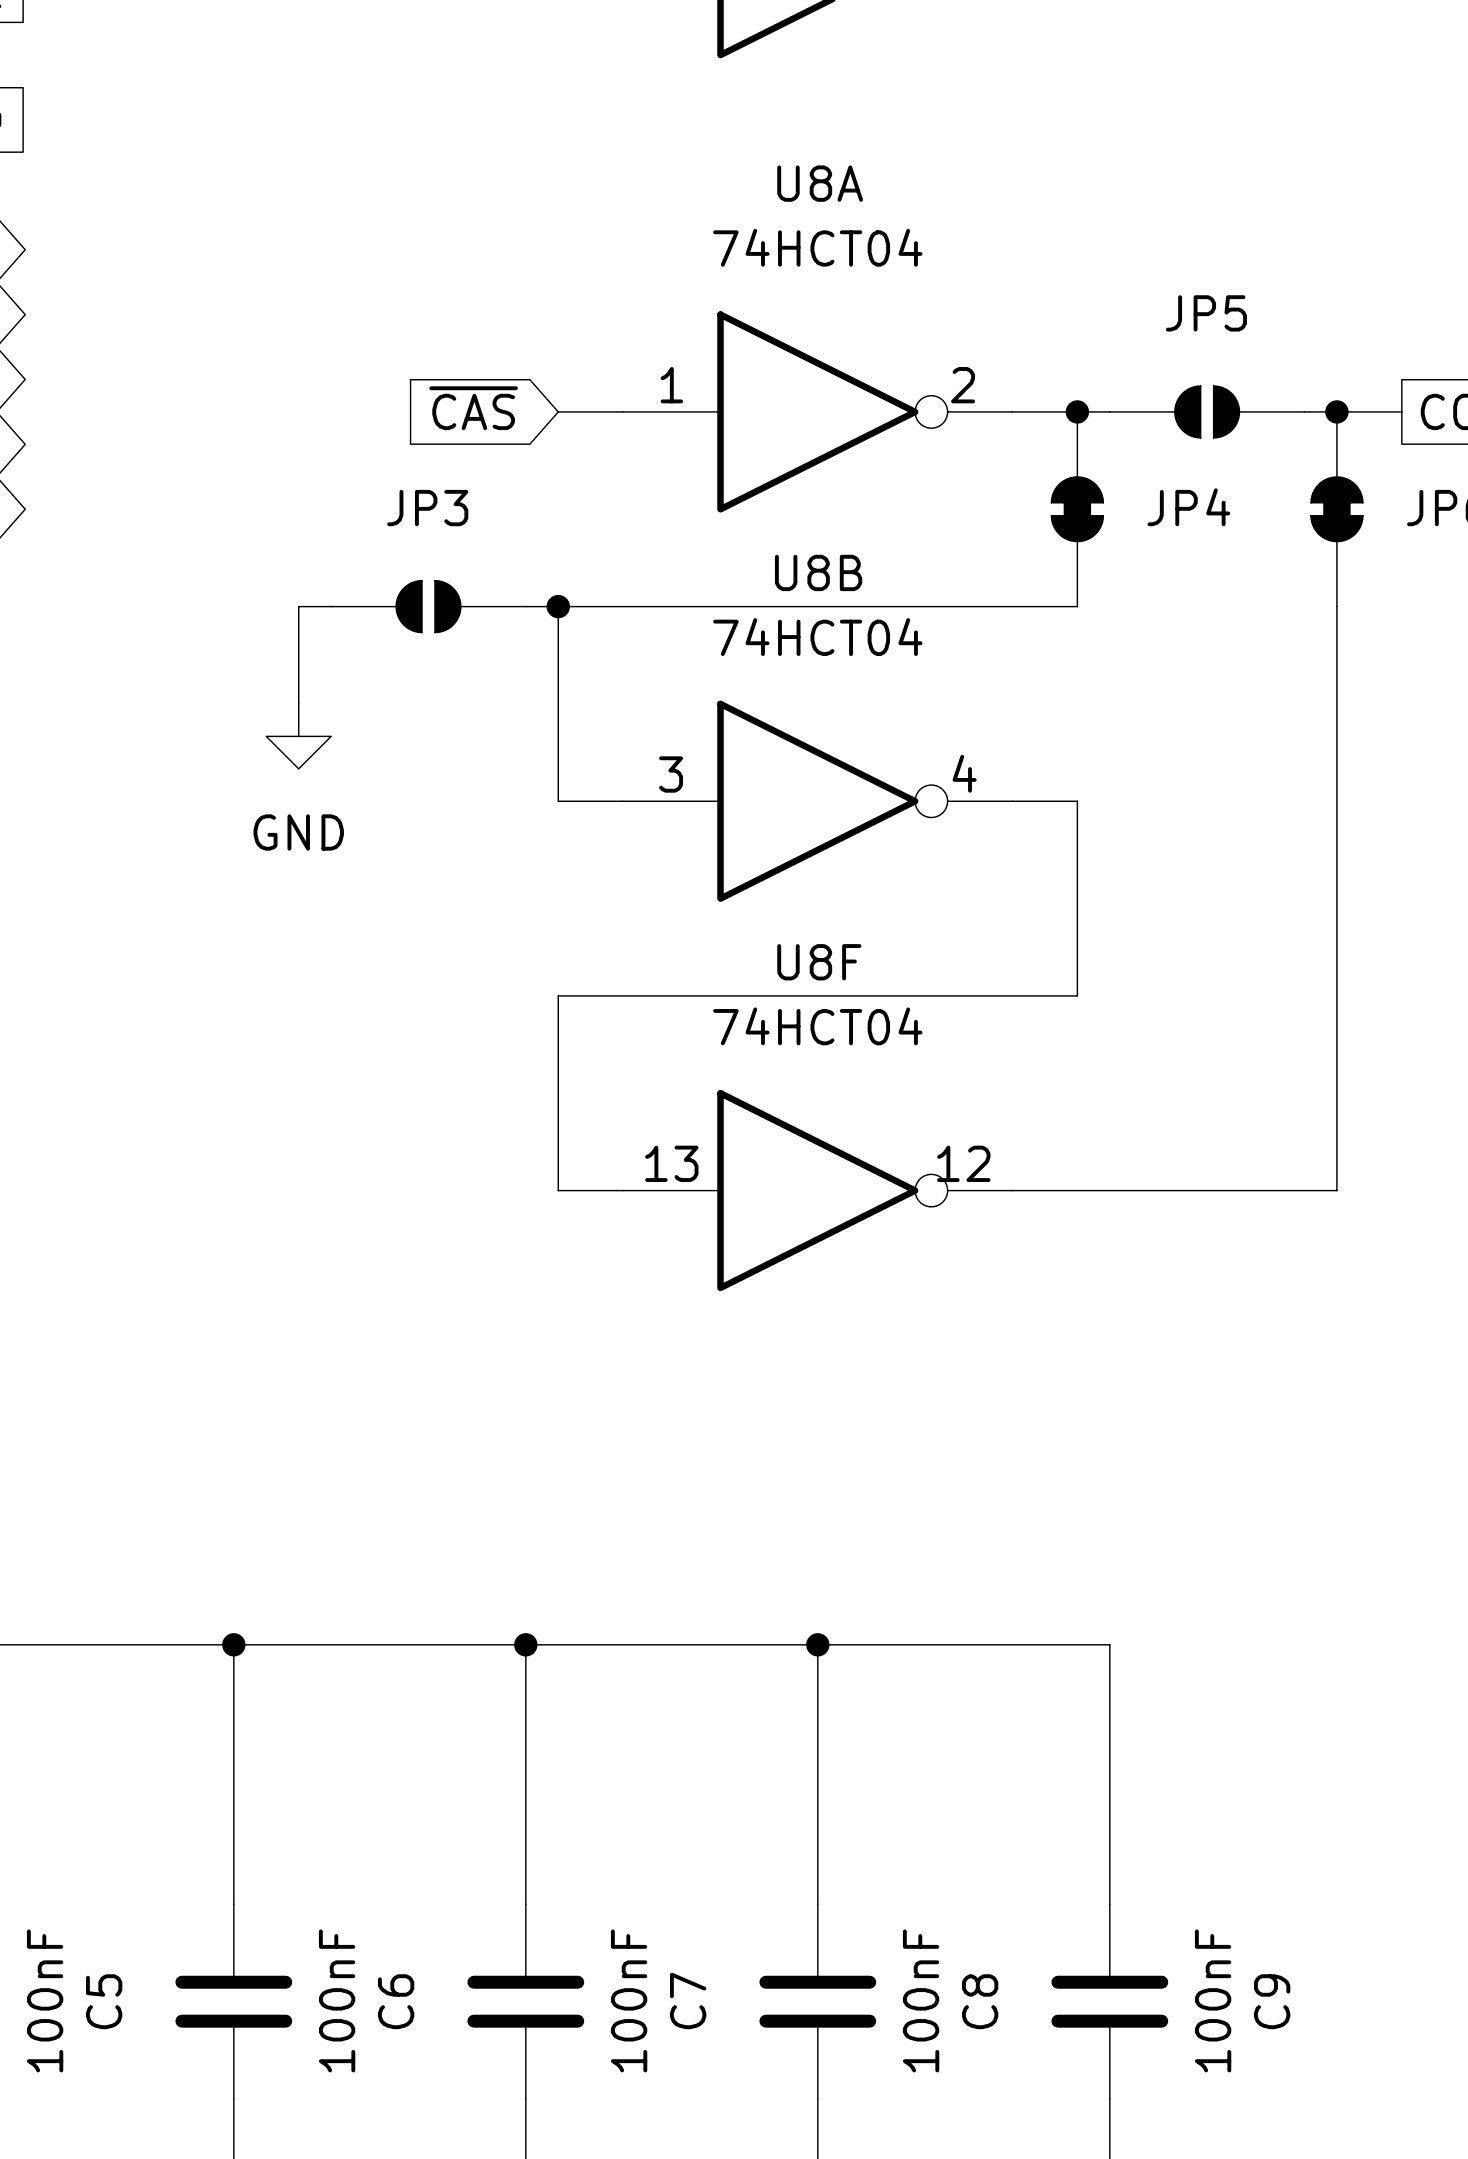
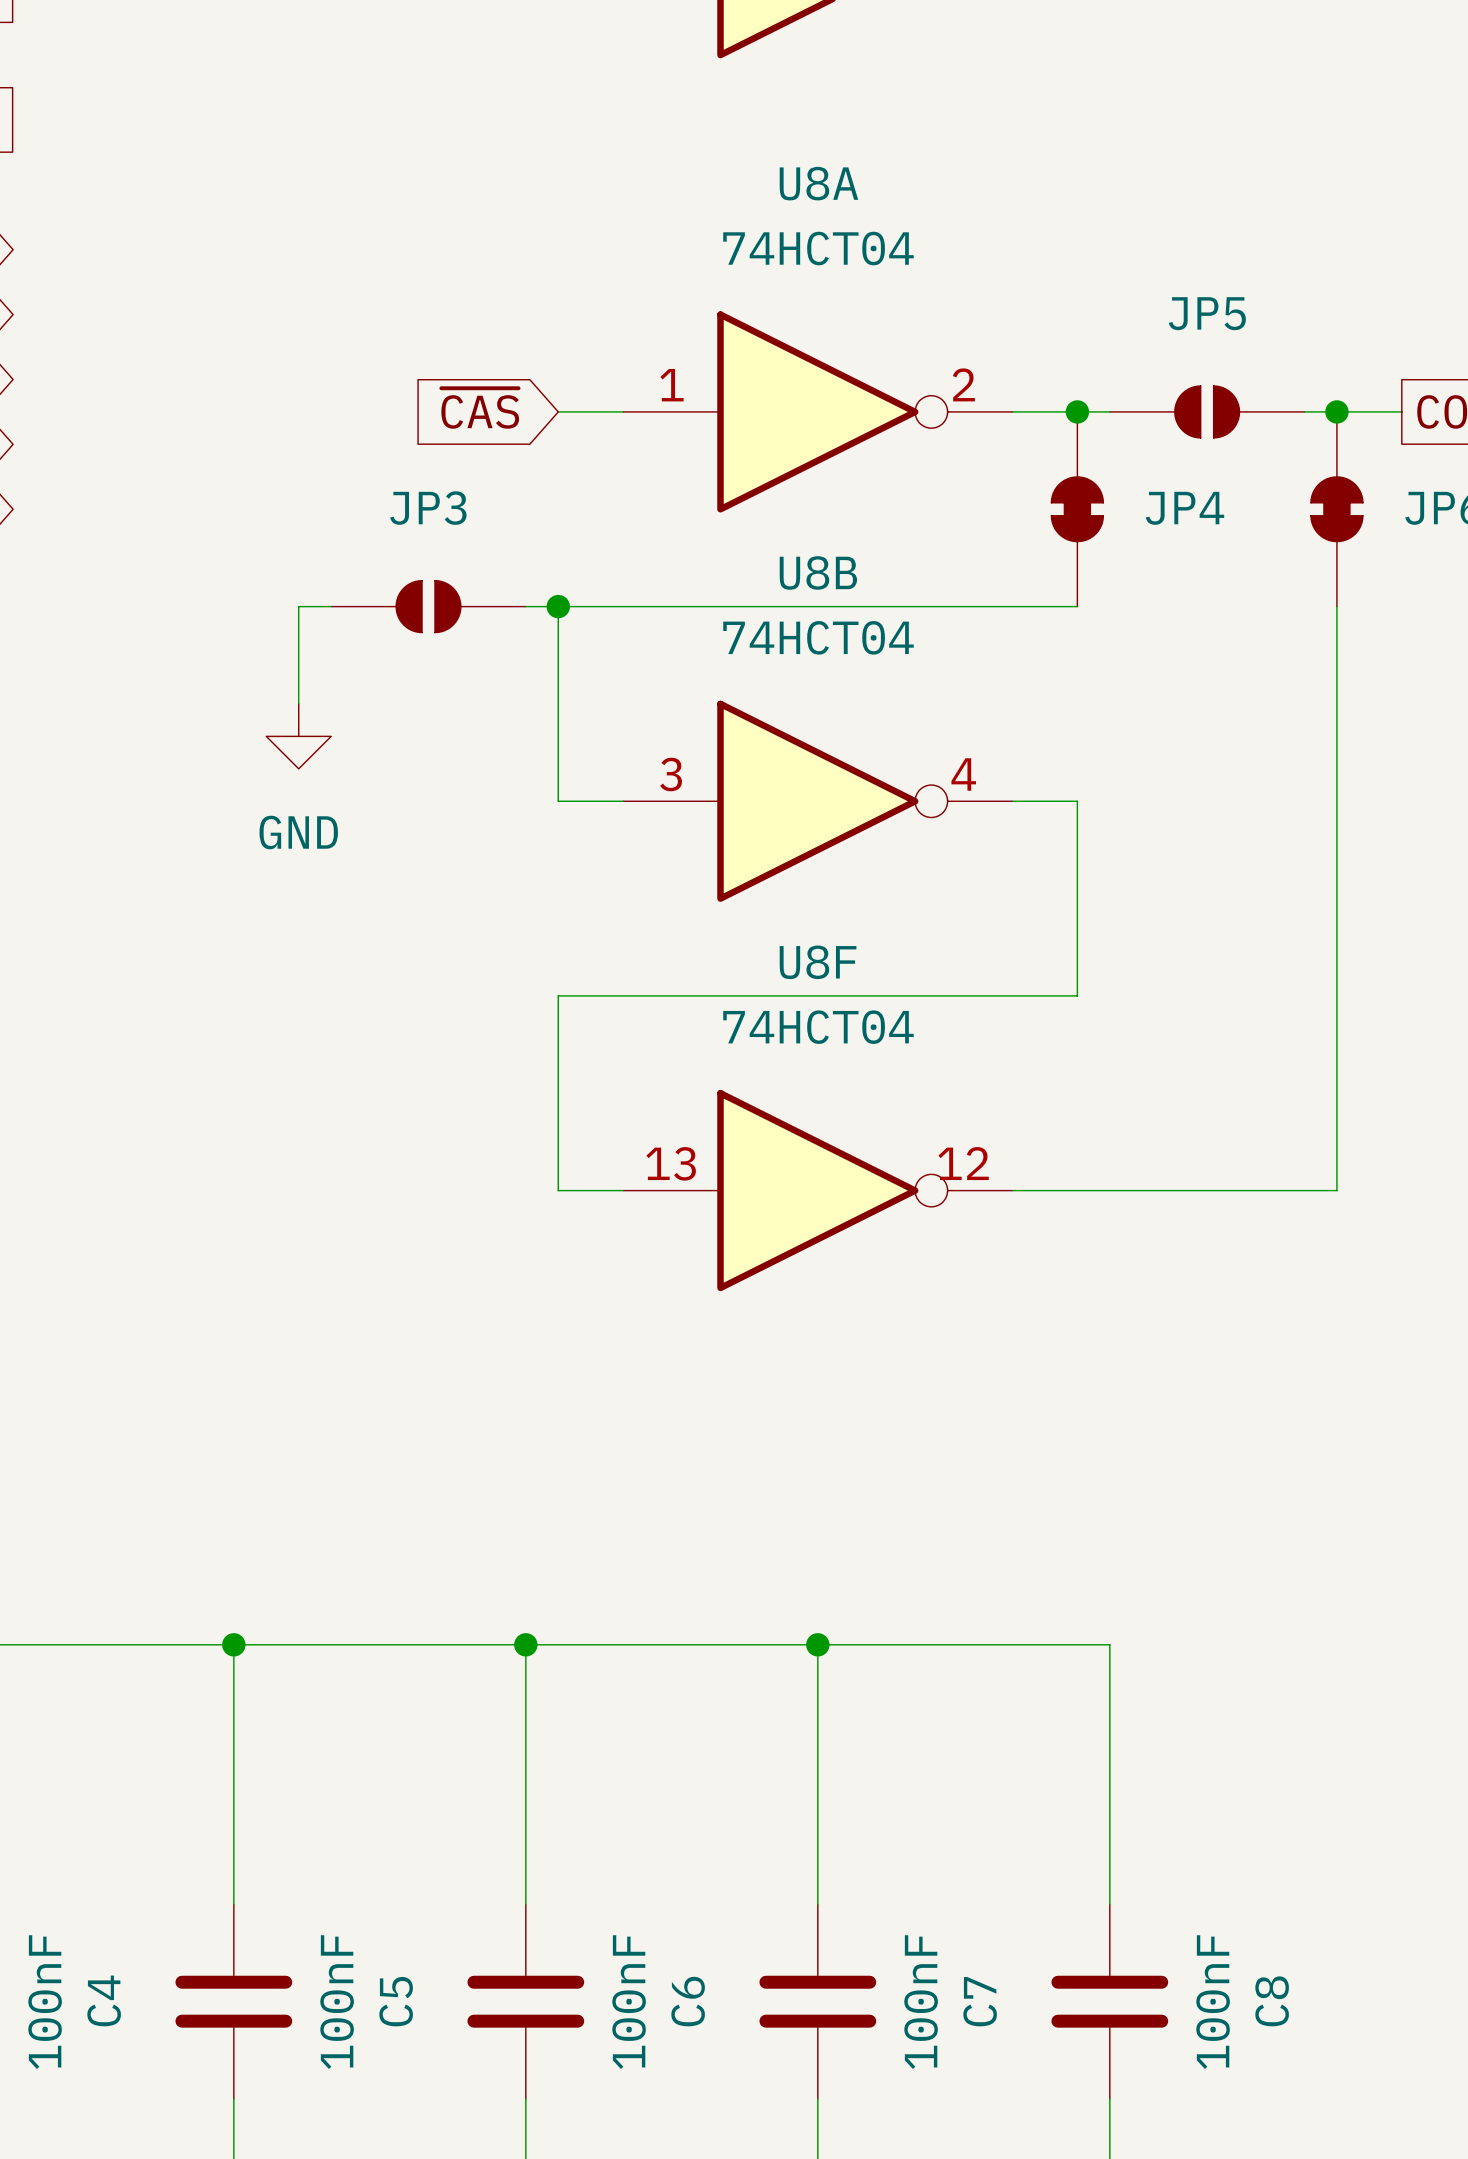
C7 name: C7 (688, 2000) -> C6 (688, 2001)
C5 name: C5 (104, 2001) -> C4 (104, 2000)
C6 name: C6 (396, 2001) -> C5 (396, 2001)
C8 name: C8 (980, 2001) -> C7 (980, 2001)
C9 name: C9 (1272, 2001) -> C8 (1272, 2001)

